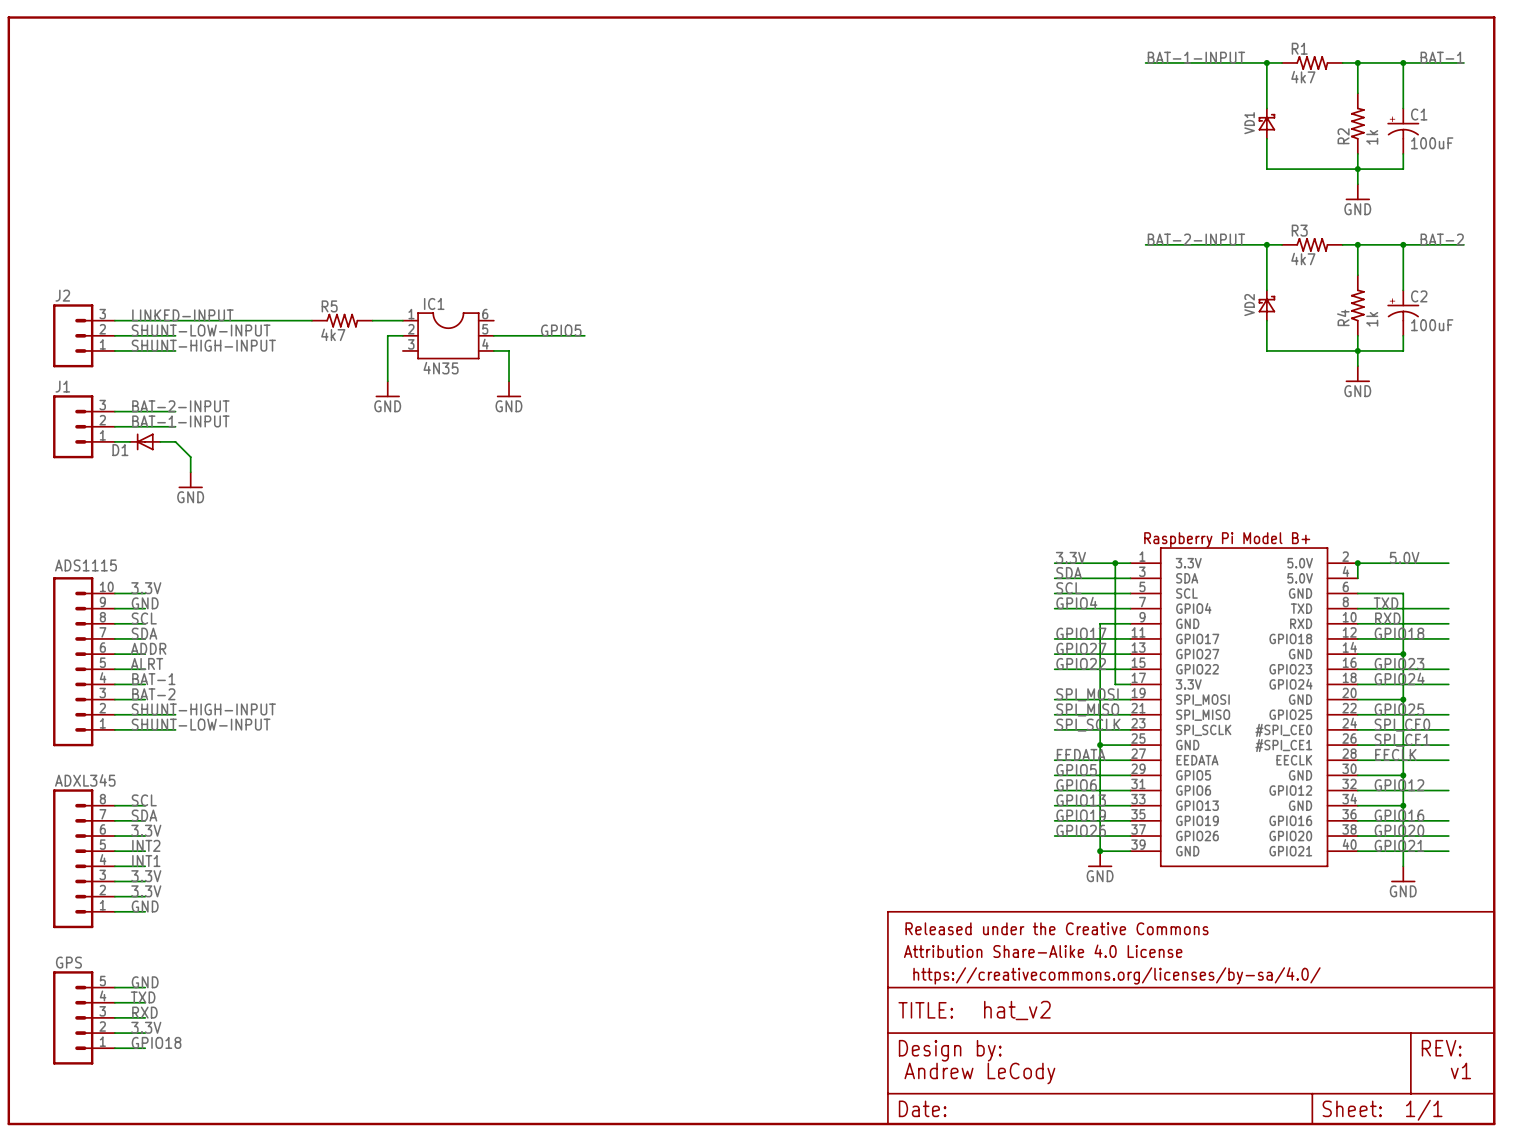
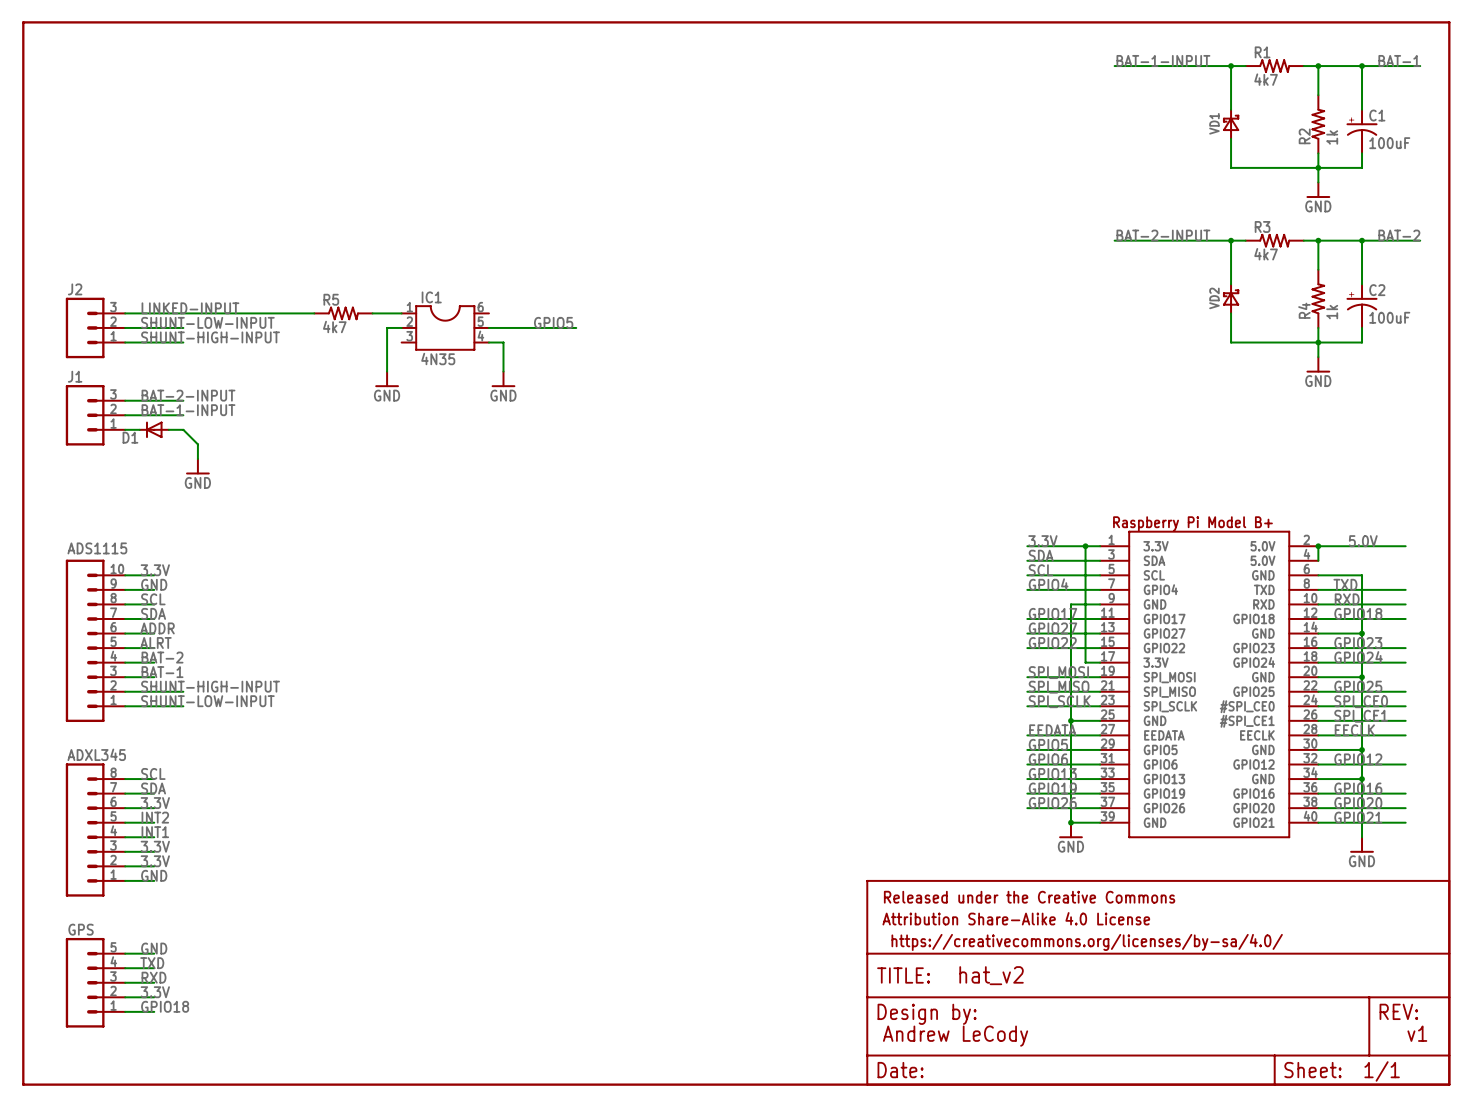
label: BAT-1 (153, 679) -> BAT-2 (162, 657)
label: BAT-2 (153, 694) -> BAT-1 (162, 672)

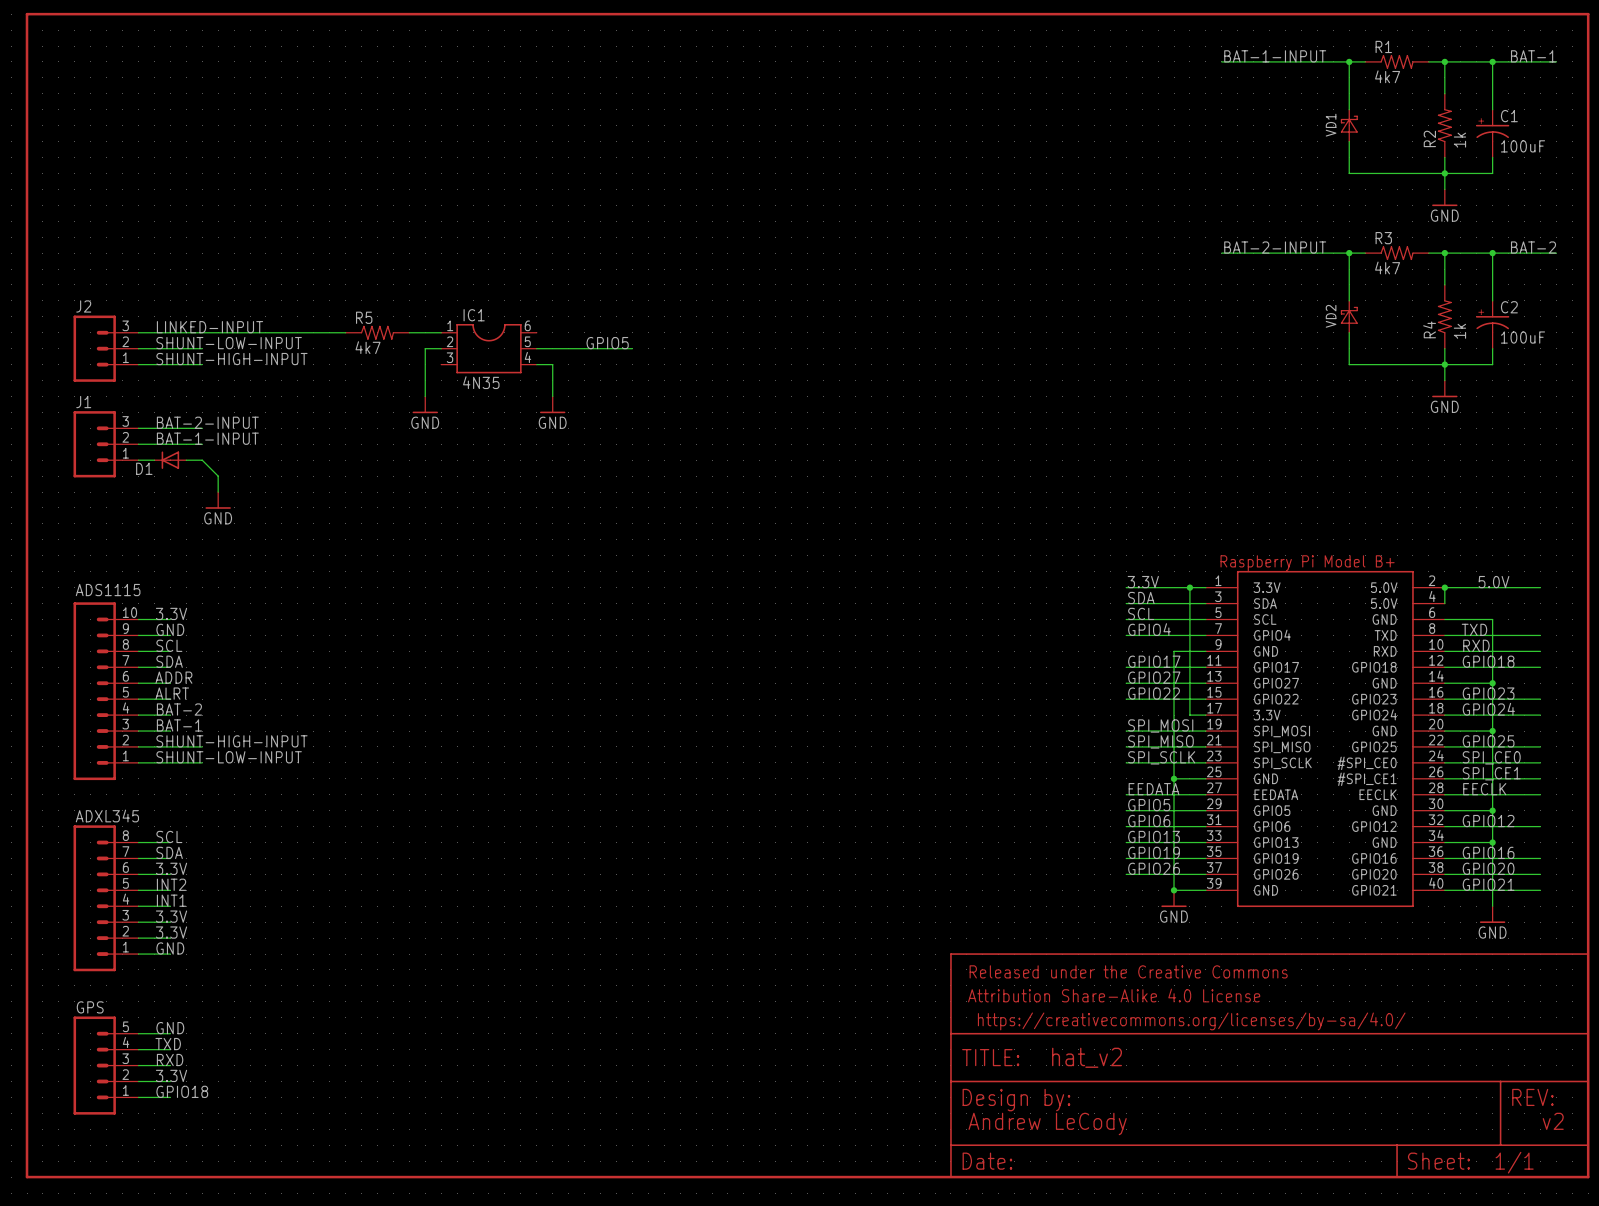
text: v1 (1417, 1033) -> v2 (1553, 1121)

